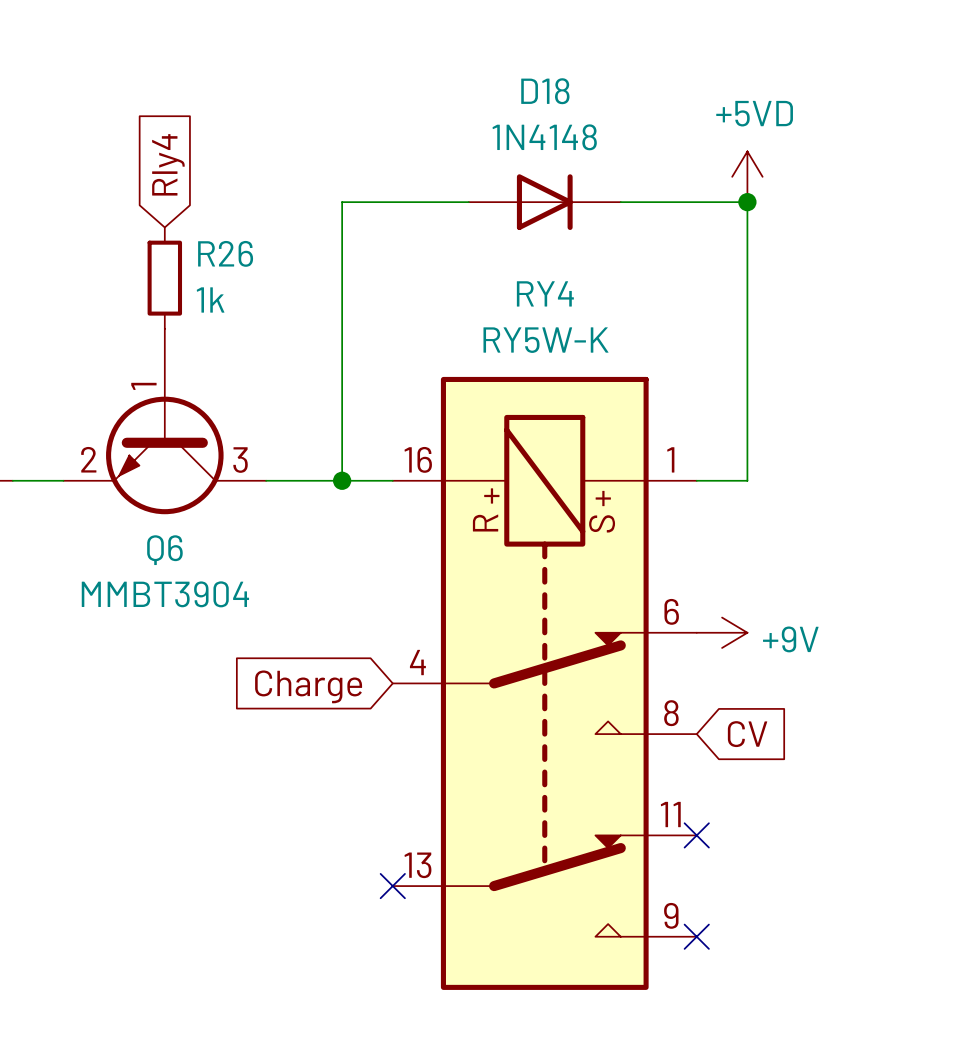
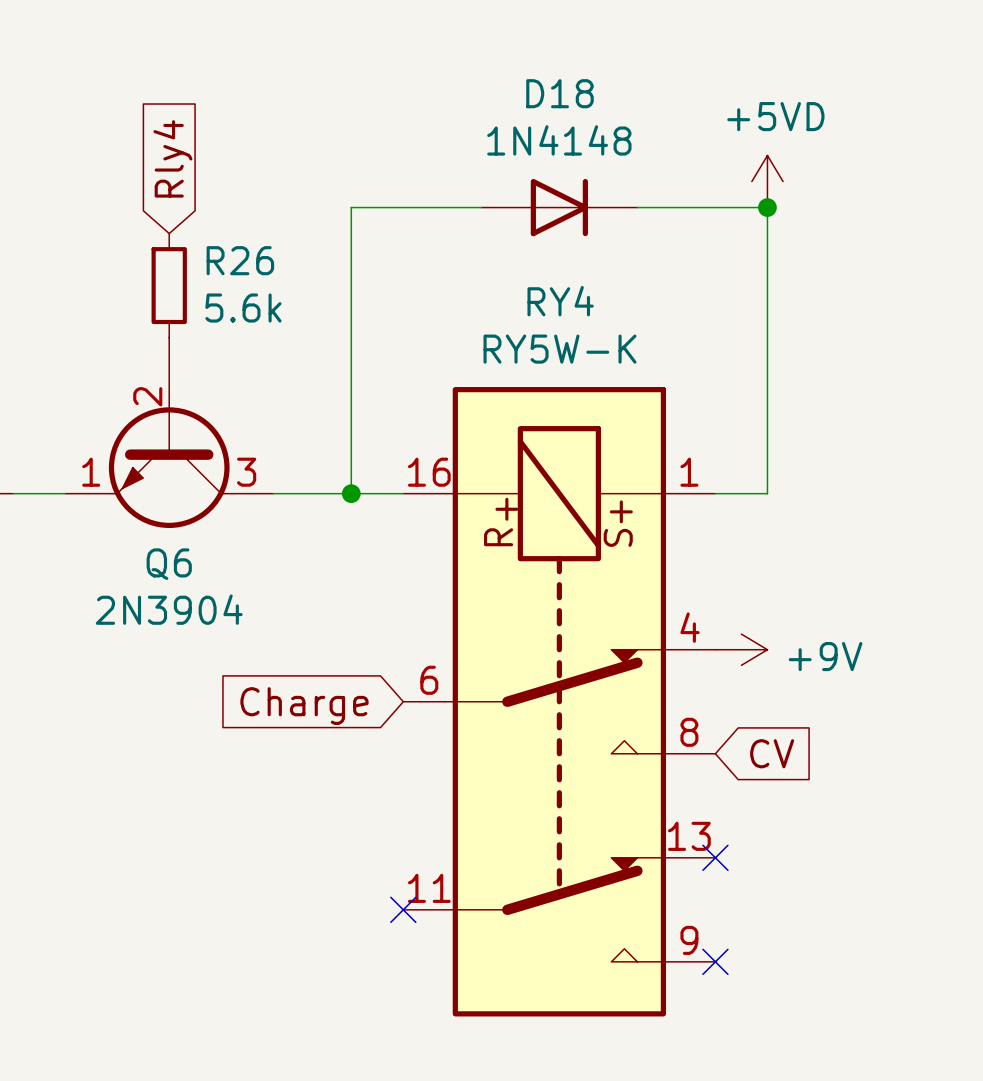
R26 value: 1k (210, 299) -> 5.6k (243, 308)
Q6 pin number: 1 (143, 386) -> 2 (147, 396)
Q6 pin number: 2 (88, 459) -> 1 (91, 472)
Q6 value: MMBT3904 (165, 594) -> 2N3904 (169, 609)
RY4 pin number: 6 (671, 611) -> 4 (690, 627)
RY4 pin number: 4 (417, 662) -> 6 (429, 680)
RY4 pin number: 11 (670, 814) -> 13 (689, 836)
RY4 pin number: 13 (417, 865) -> 11 (429, 888)

